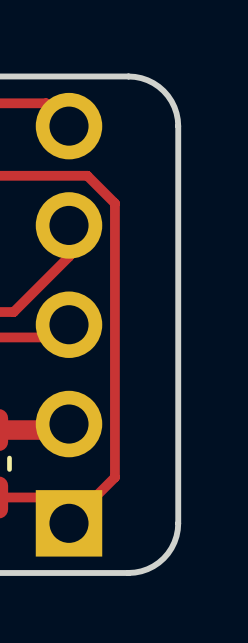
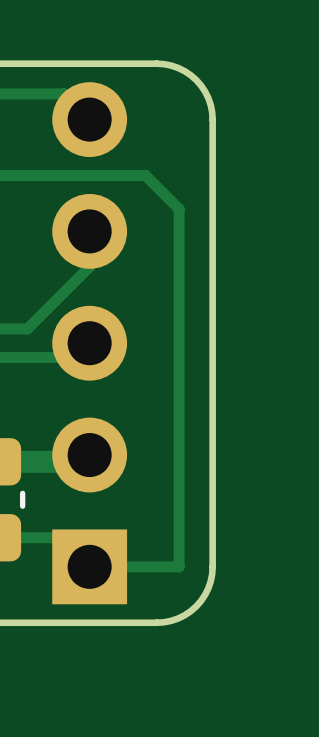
track: (87, 175) (114, 203) (114, 477) (69, 523) -> (110, 175) (145, 175) (179, 209) (179, 566) (89, 566)

